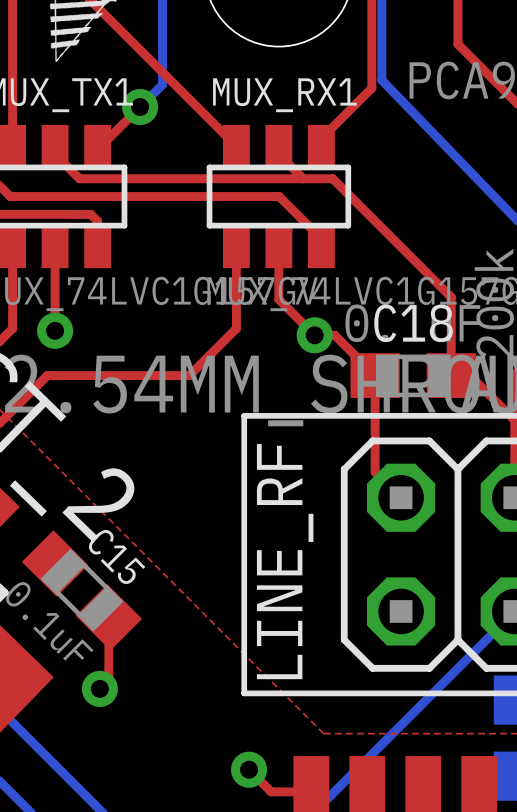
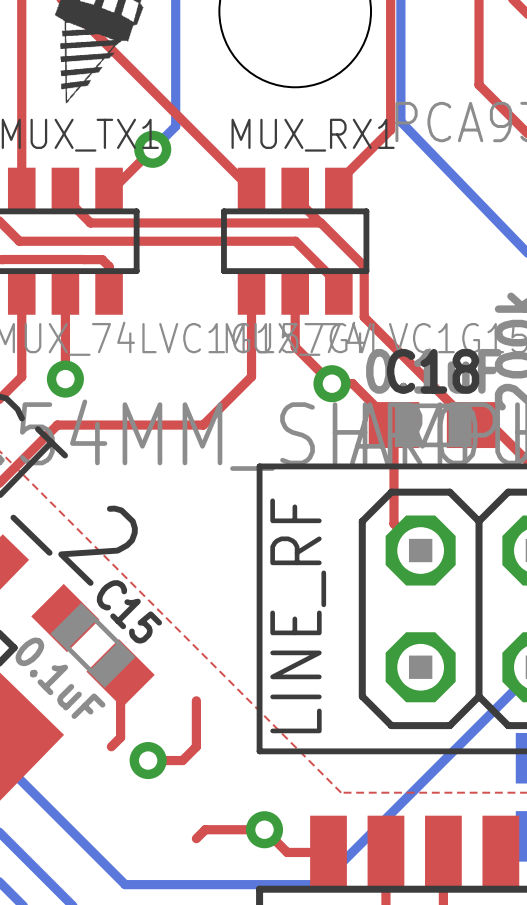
top track: (303, 178) (332, 178) (451, 297) (451, 375) -> (320, 222) (364, 266) (364, 317) (472, 425)
top track: none -> (196, 700) (196, 746) (182, 760) (148, 760)
via position: (99, 688) -> (148, 760)
top track: none -> (264, 829) (205, 829) (196, 838)

